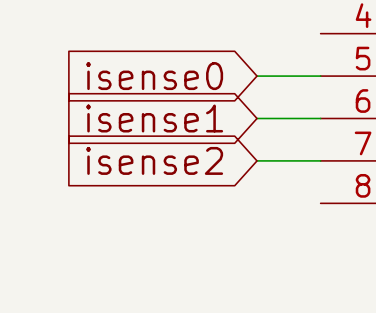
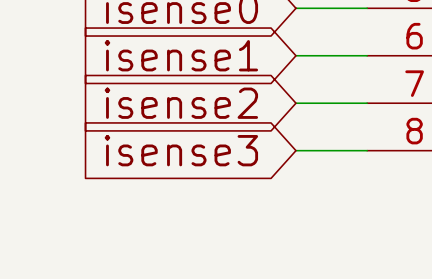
global label: none -> isense3 (181, 150)
wire: none -> (295, 150) (367, 150)

